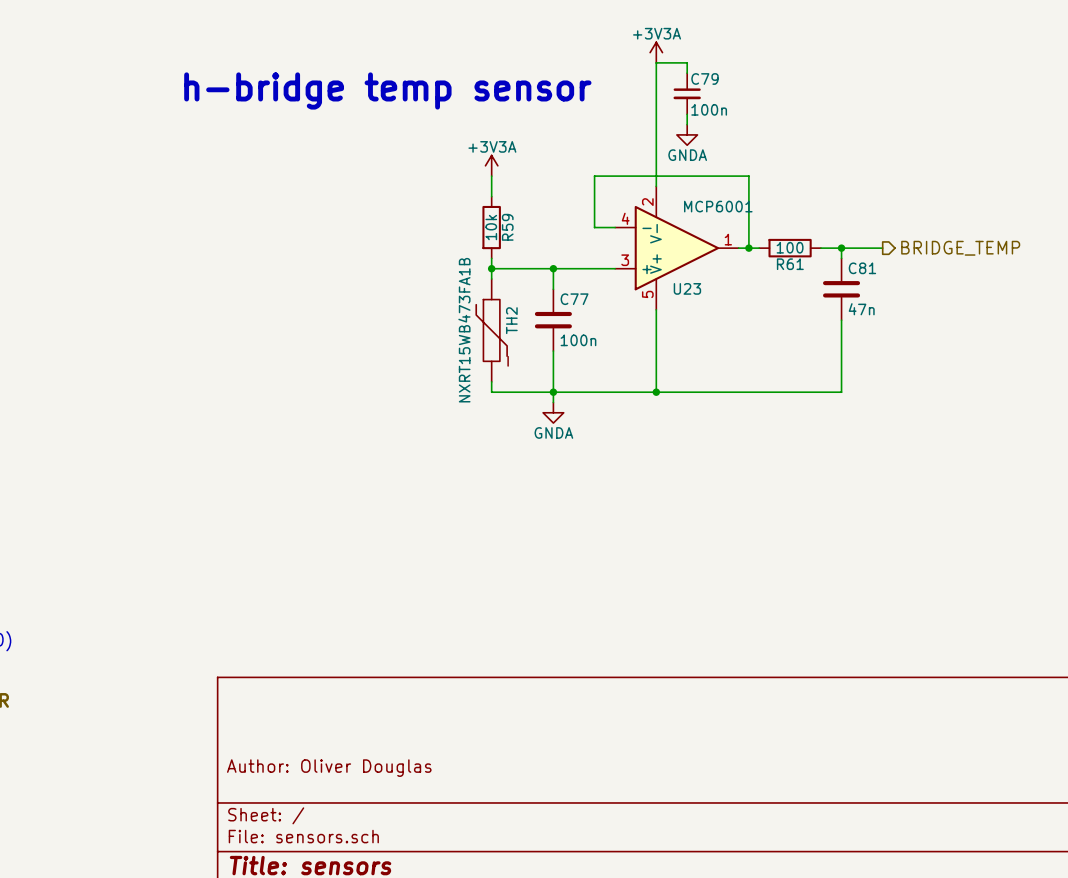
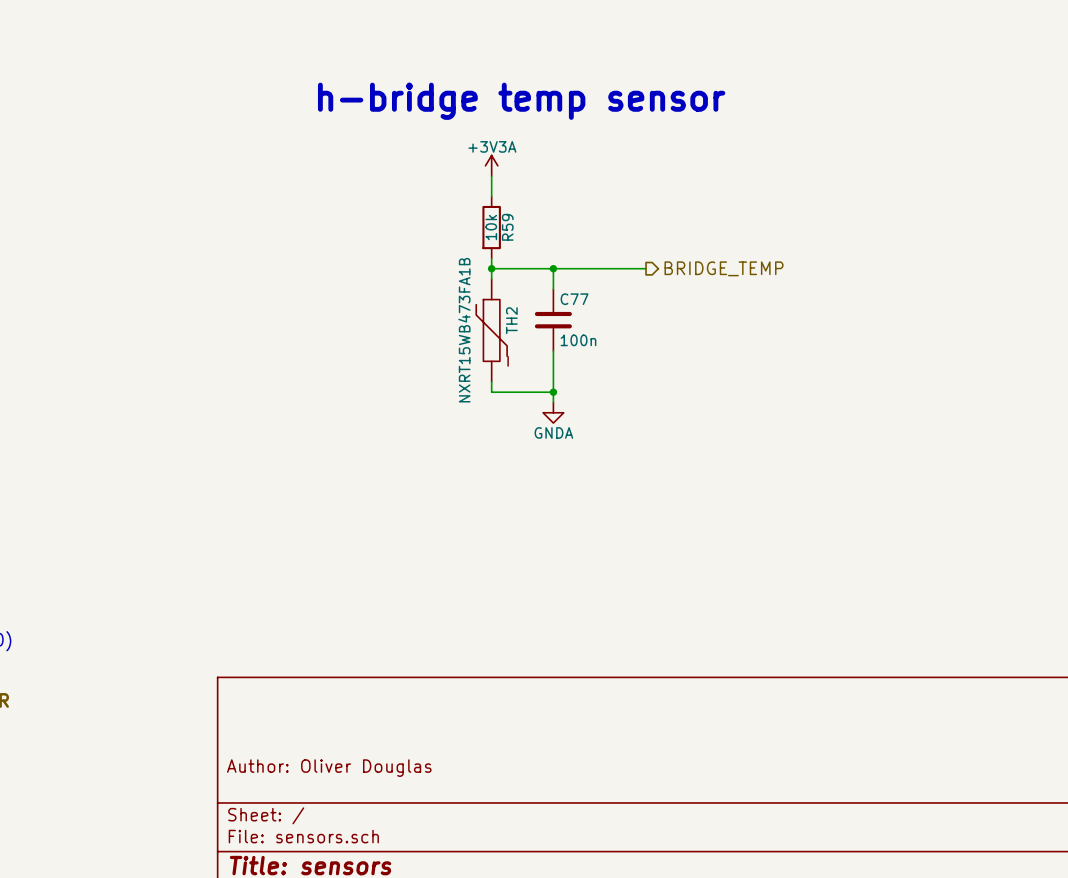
power symbol: +3V3A (656, 52) -> none
wire: (687, 73) (687, 62) (656, 62) (656, 186) -> none
text position: h-bridge temp sensor (387, 90) -> h-bridge temp sensor (521, 101)
C79: 100n (687, 93) -> none
wire: (687, 114) (687, 124) -> none
power symbol: GNDA (687, 134) -> none
wire: (615, 227) (594, 227) (594, 176) (748, 176) (748, 248) -> none
U23: MCP6001 (676, 248) -> none
wire: (738, 248) (759, 248) -> none
junction: (748, 248) -> none
R61: 100 (790, 248) -> none
wire: (820, 248) (882, 248) -> none
wire: (841, 248) (841, 258) -> none
junction: (841, 248) -> none
hierarchical label: BRIDGE_TEMP (960, 248) -> none
hierarchical label: none -> BRIDGE_TEMP (724, 268)
C81: 47n (841, 289) -> none
wire: (656, 309) (656, 392) -> none
wire: (841, 320) (841, 392) (553, 392) -> none
junction: (656, 392) -> none

